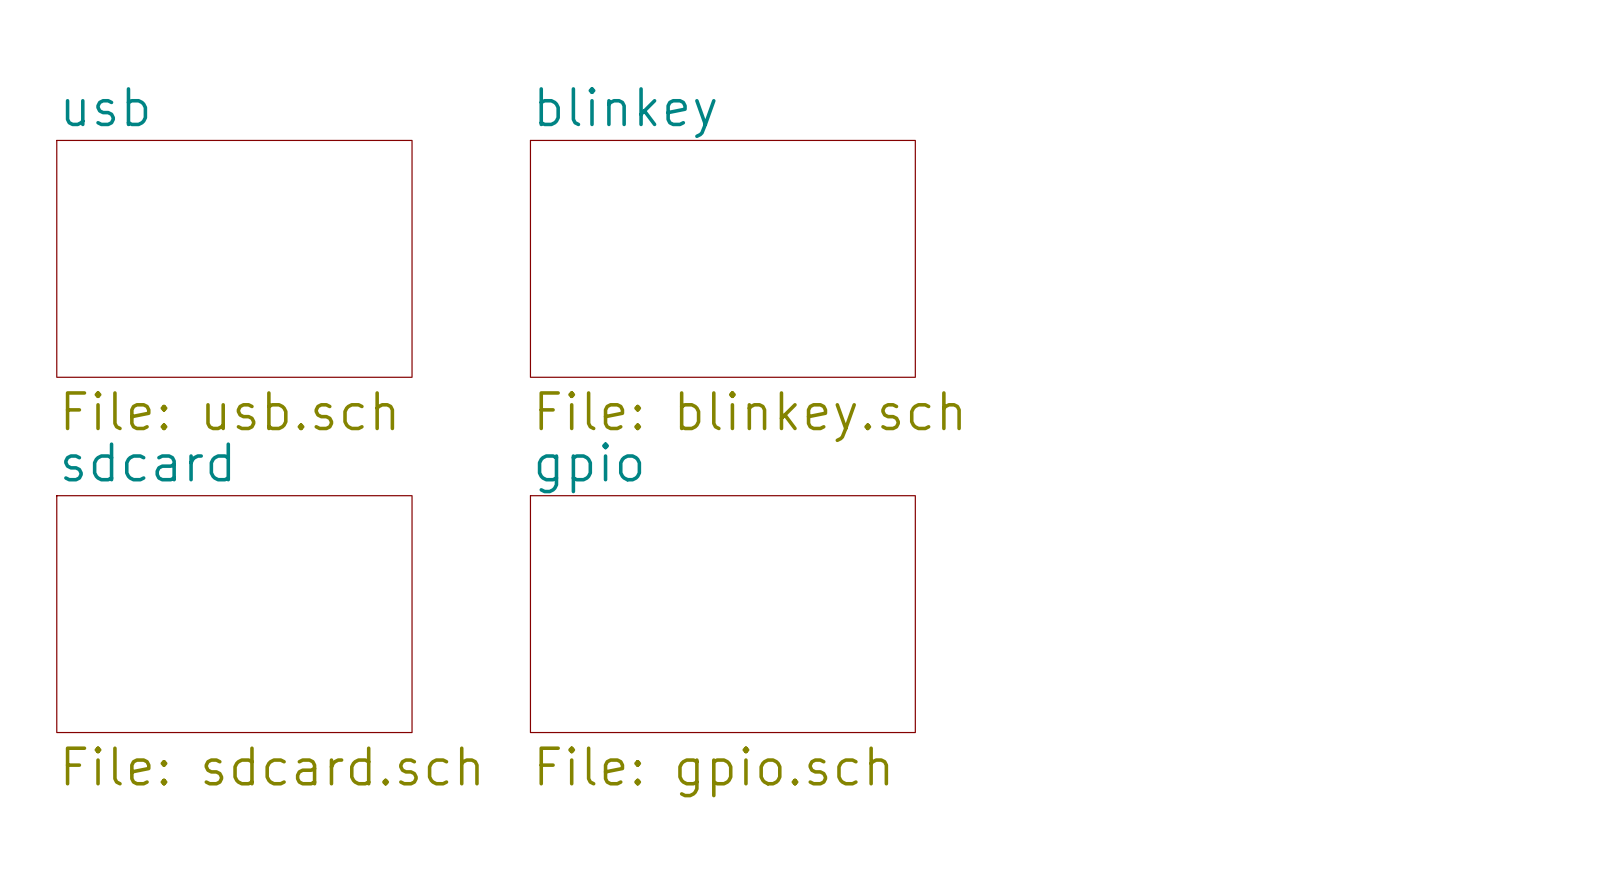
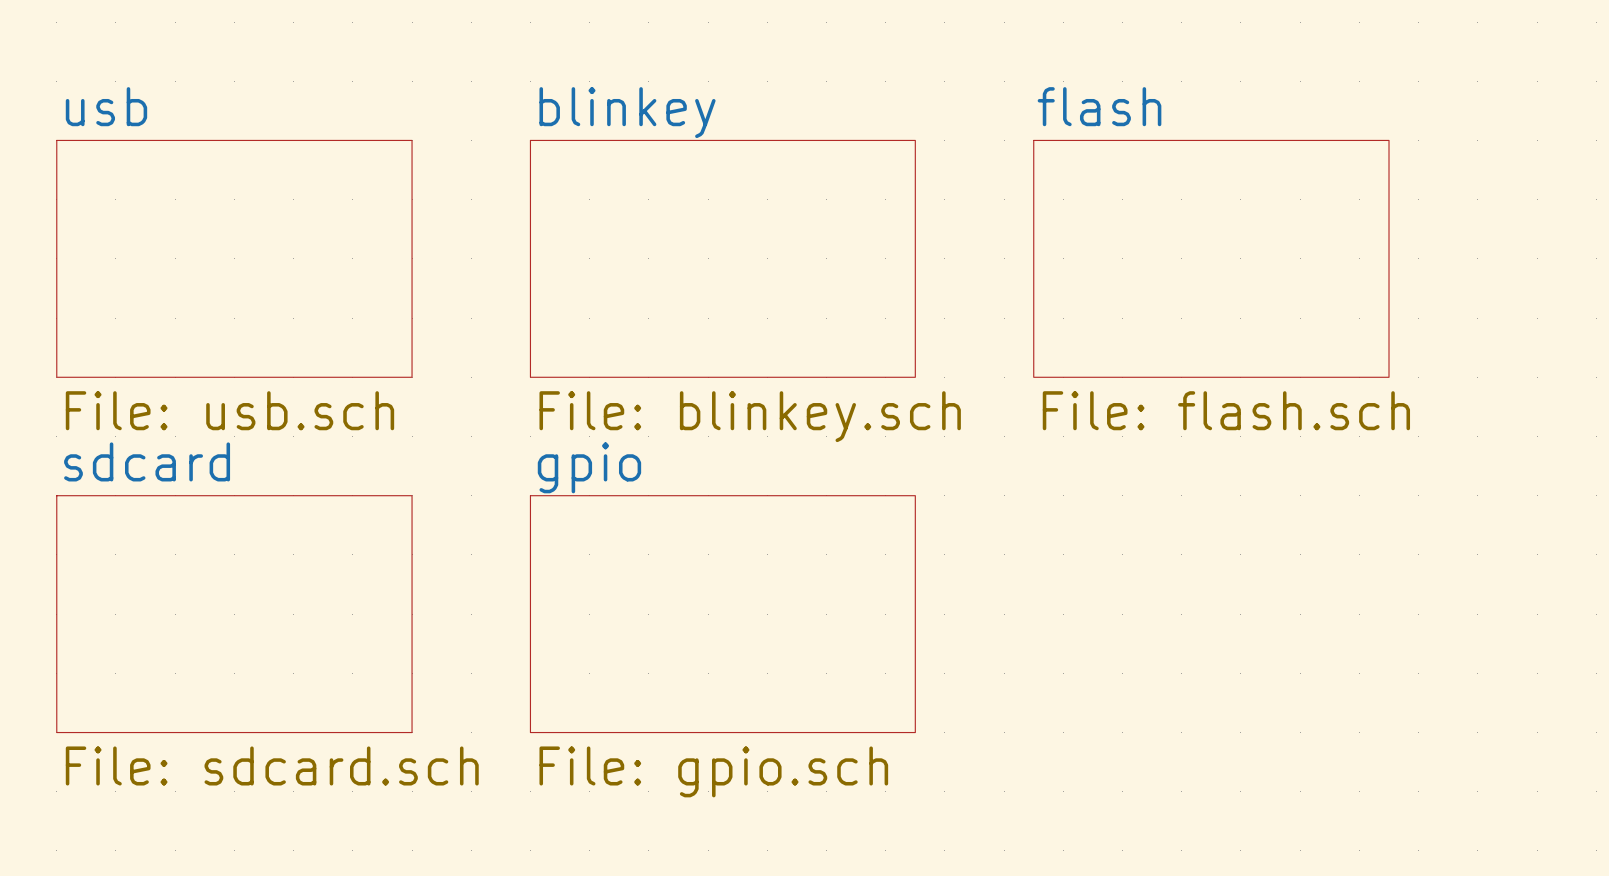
sheet flash: none -> File: flash.sch (1211, 258)

